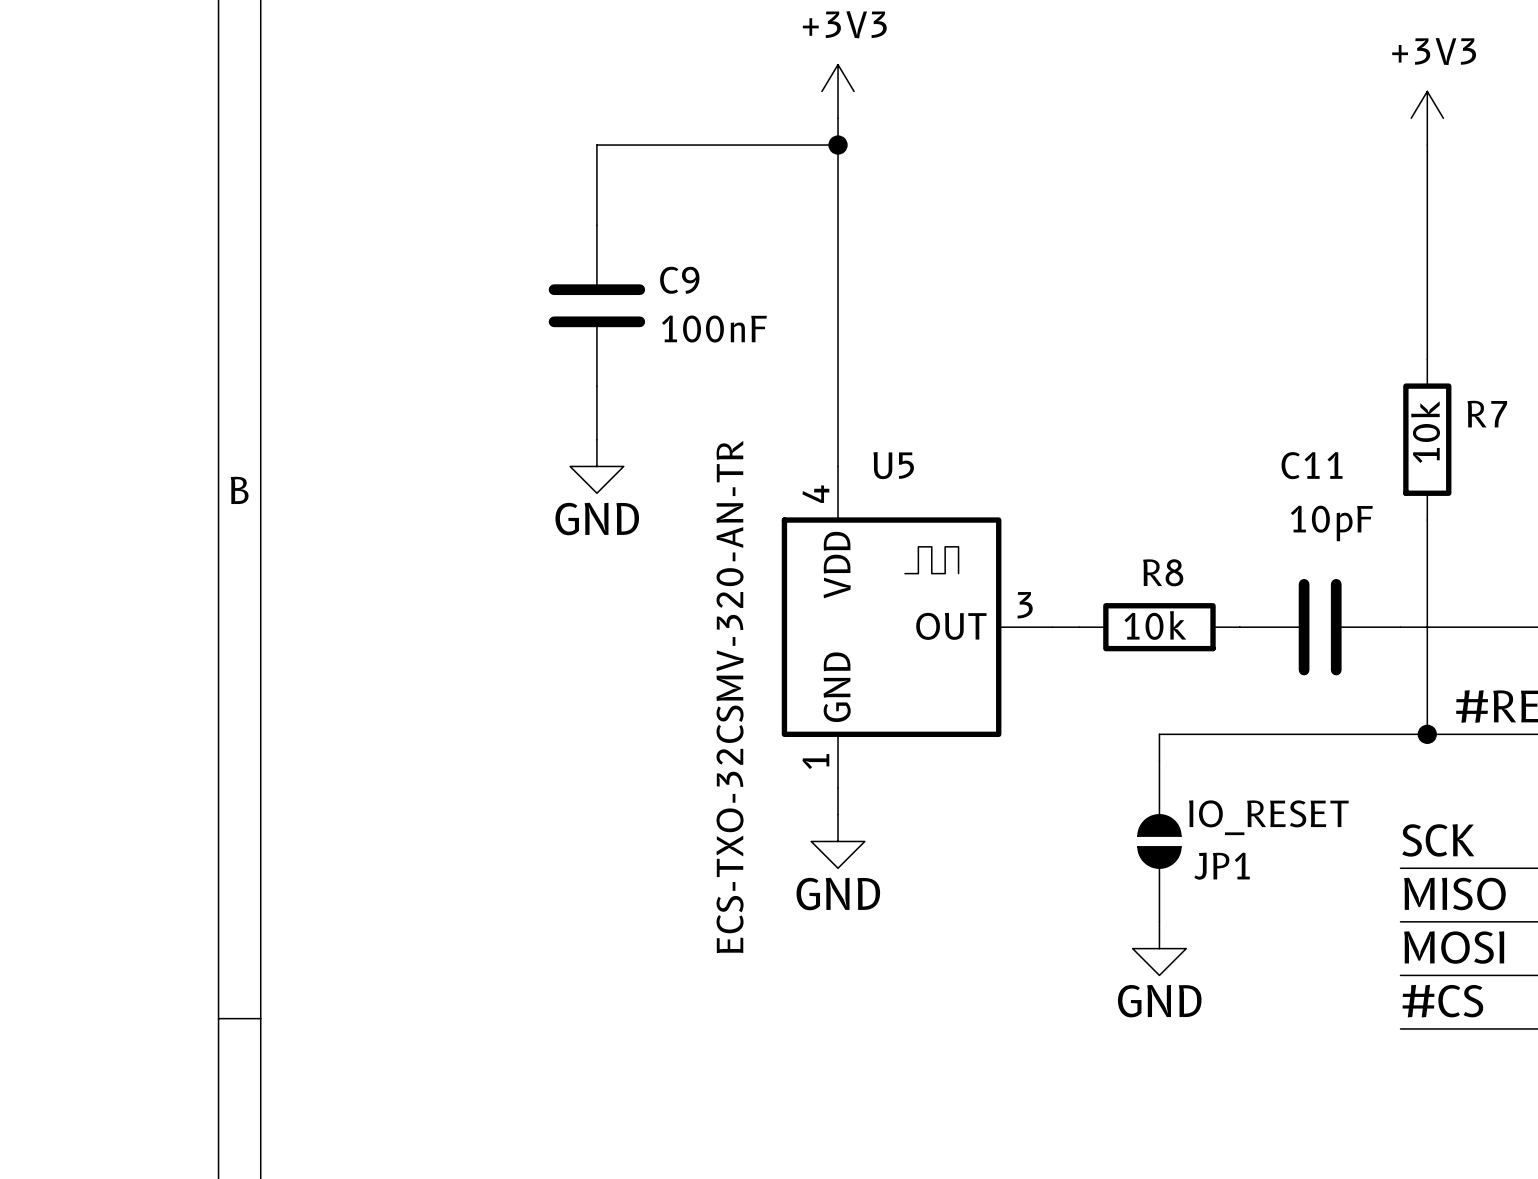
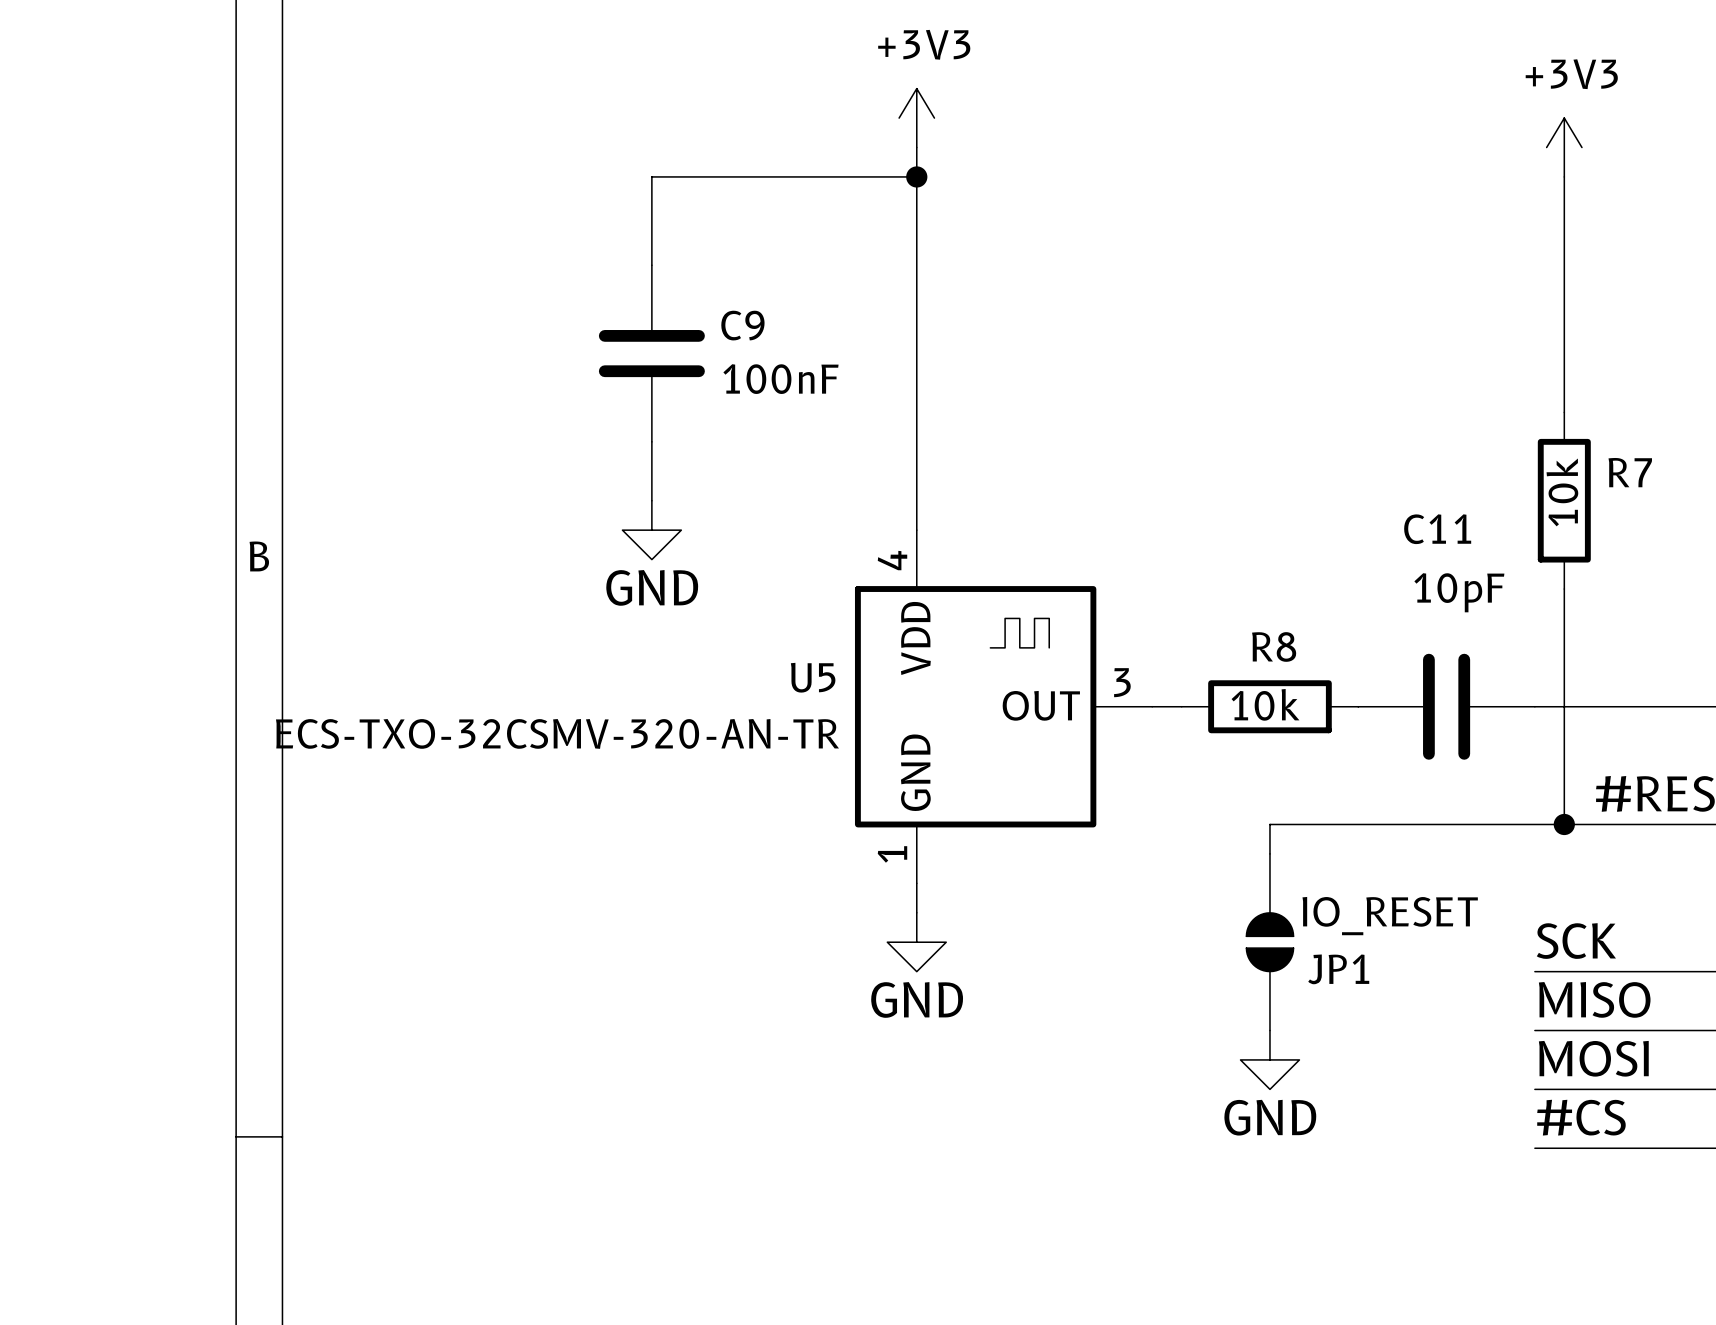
U5 name position: U5 (893, 465) -> U5 (813, 677)
U5 value rotation: 0° (730, 697) -> 90° clockwise (557, 733)

